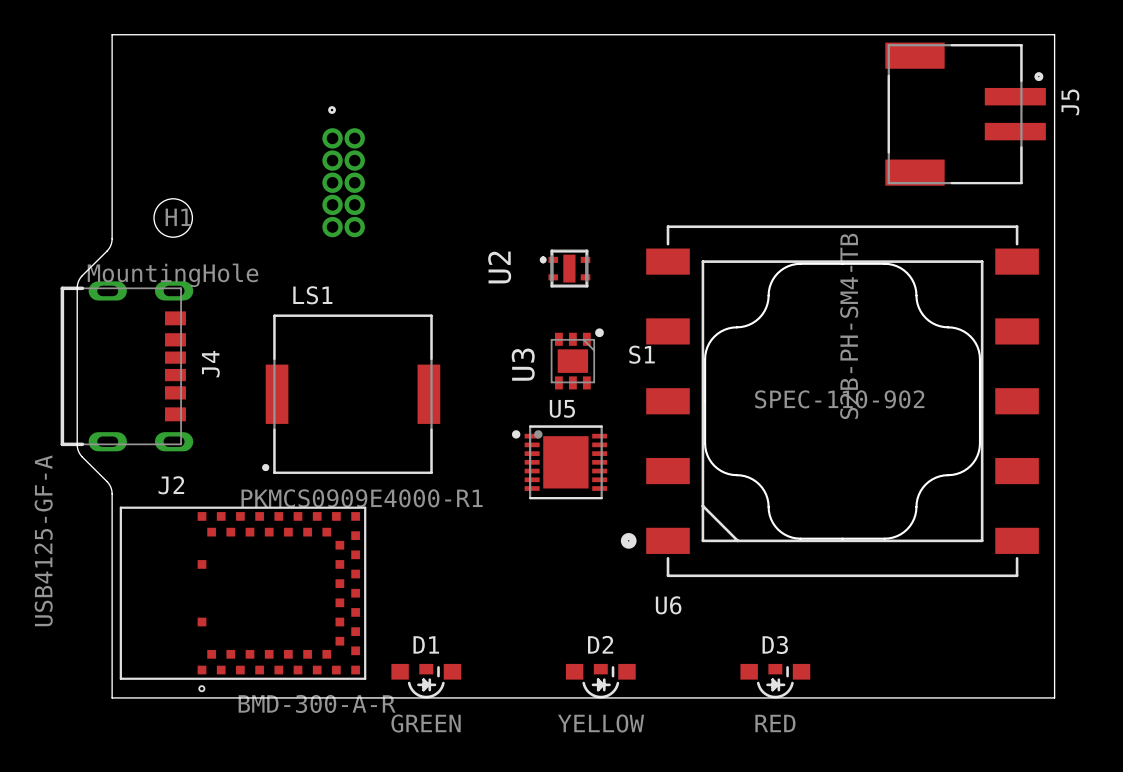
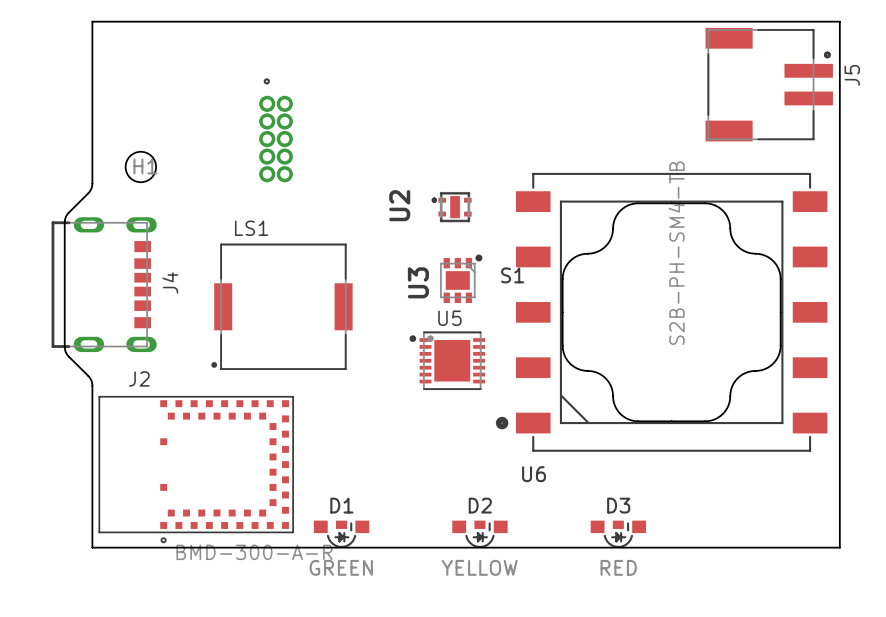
H1 value: MountingHole (173, 275) -> none
U6 value: SPEC-110-902 (839, 399) -> none
LS1 value: PKMCS0909E4000-R1 (362, 498) -> none
J4 value: USB4125-GF-A (43, 540) -> none

